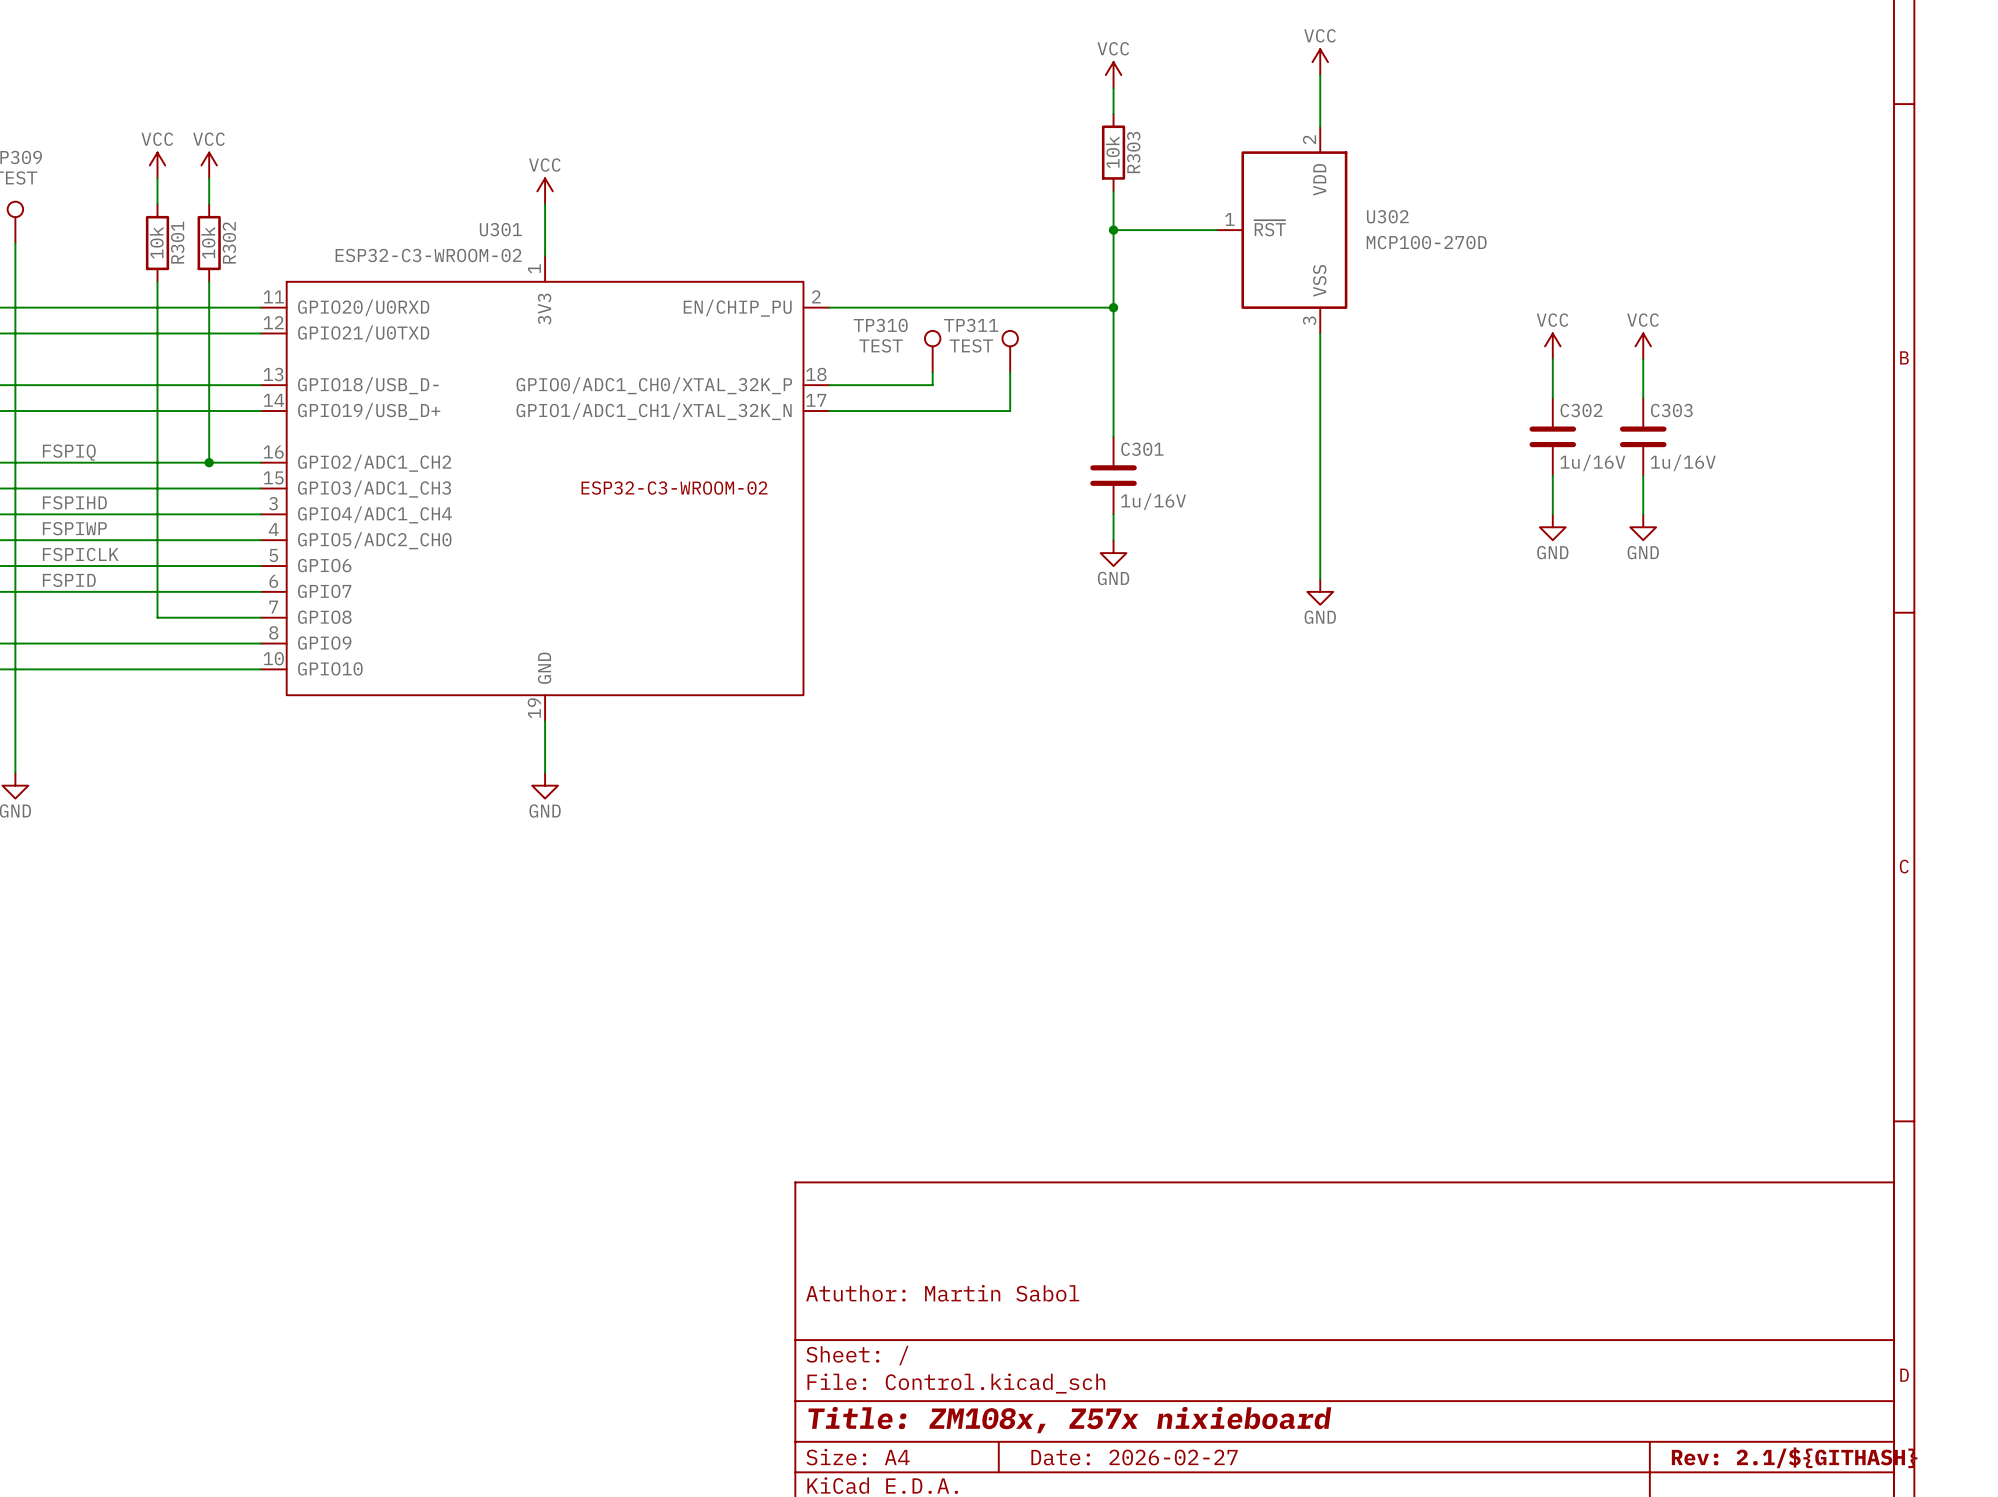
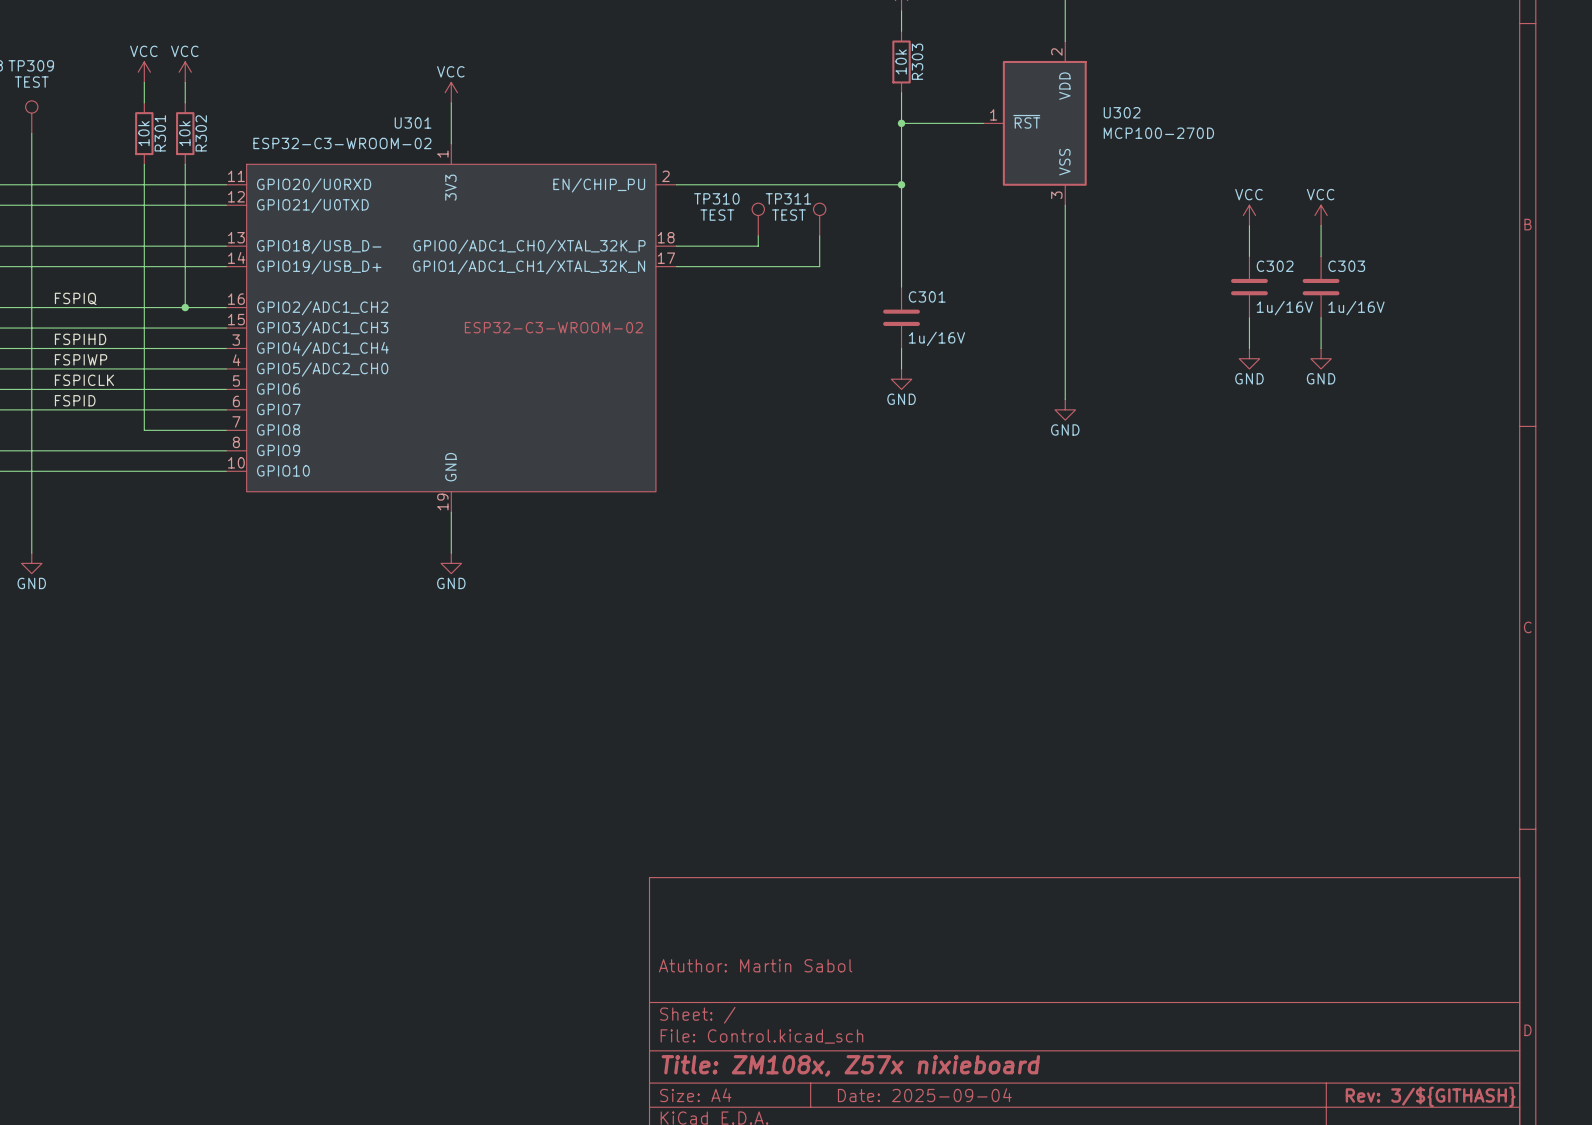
title block: Date: 2026-02-27 (1134, 1457) -> Date: 2025-09-04 (924, 1095)
title block: Rev: 2.1/${GITHASH} (1794, 1457) -> Rev: 3/${GITHASH} (1430, 1096)

